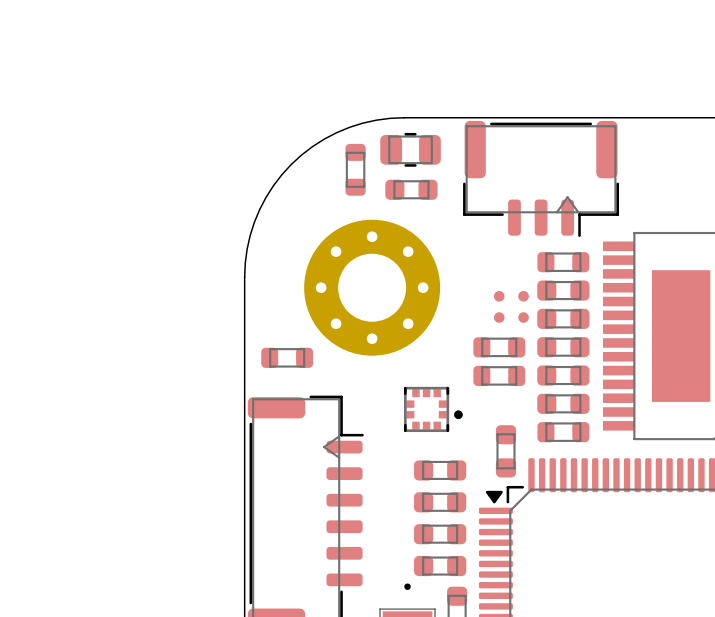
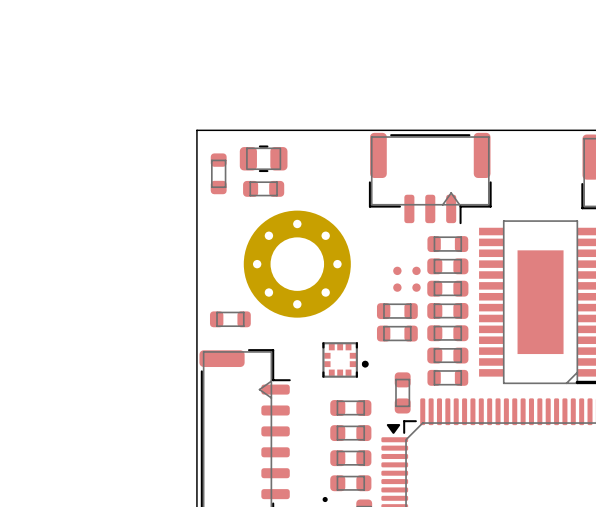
board edge: (404, 117) (376, 120) (349, 127) (324, 139) (291, 164) (273, 185) (254, 222) (247, 249) (244, 277) -> (322, 130) (196, 130) (196, 255)
part position: (410, 149) -> (263, 158)
part position: (355, 169) -> (218, 173)
part position: (411, 189) -> (263, 188)

